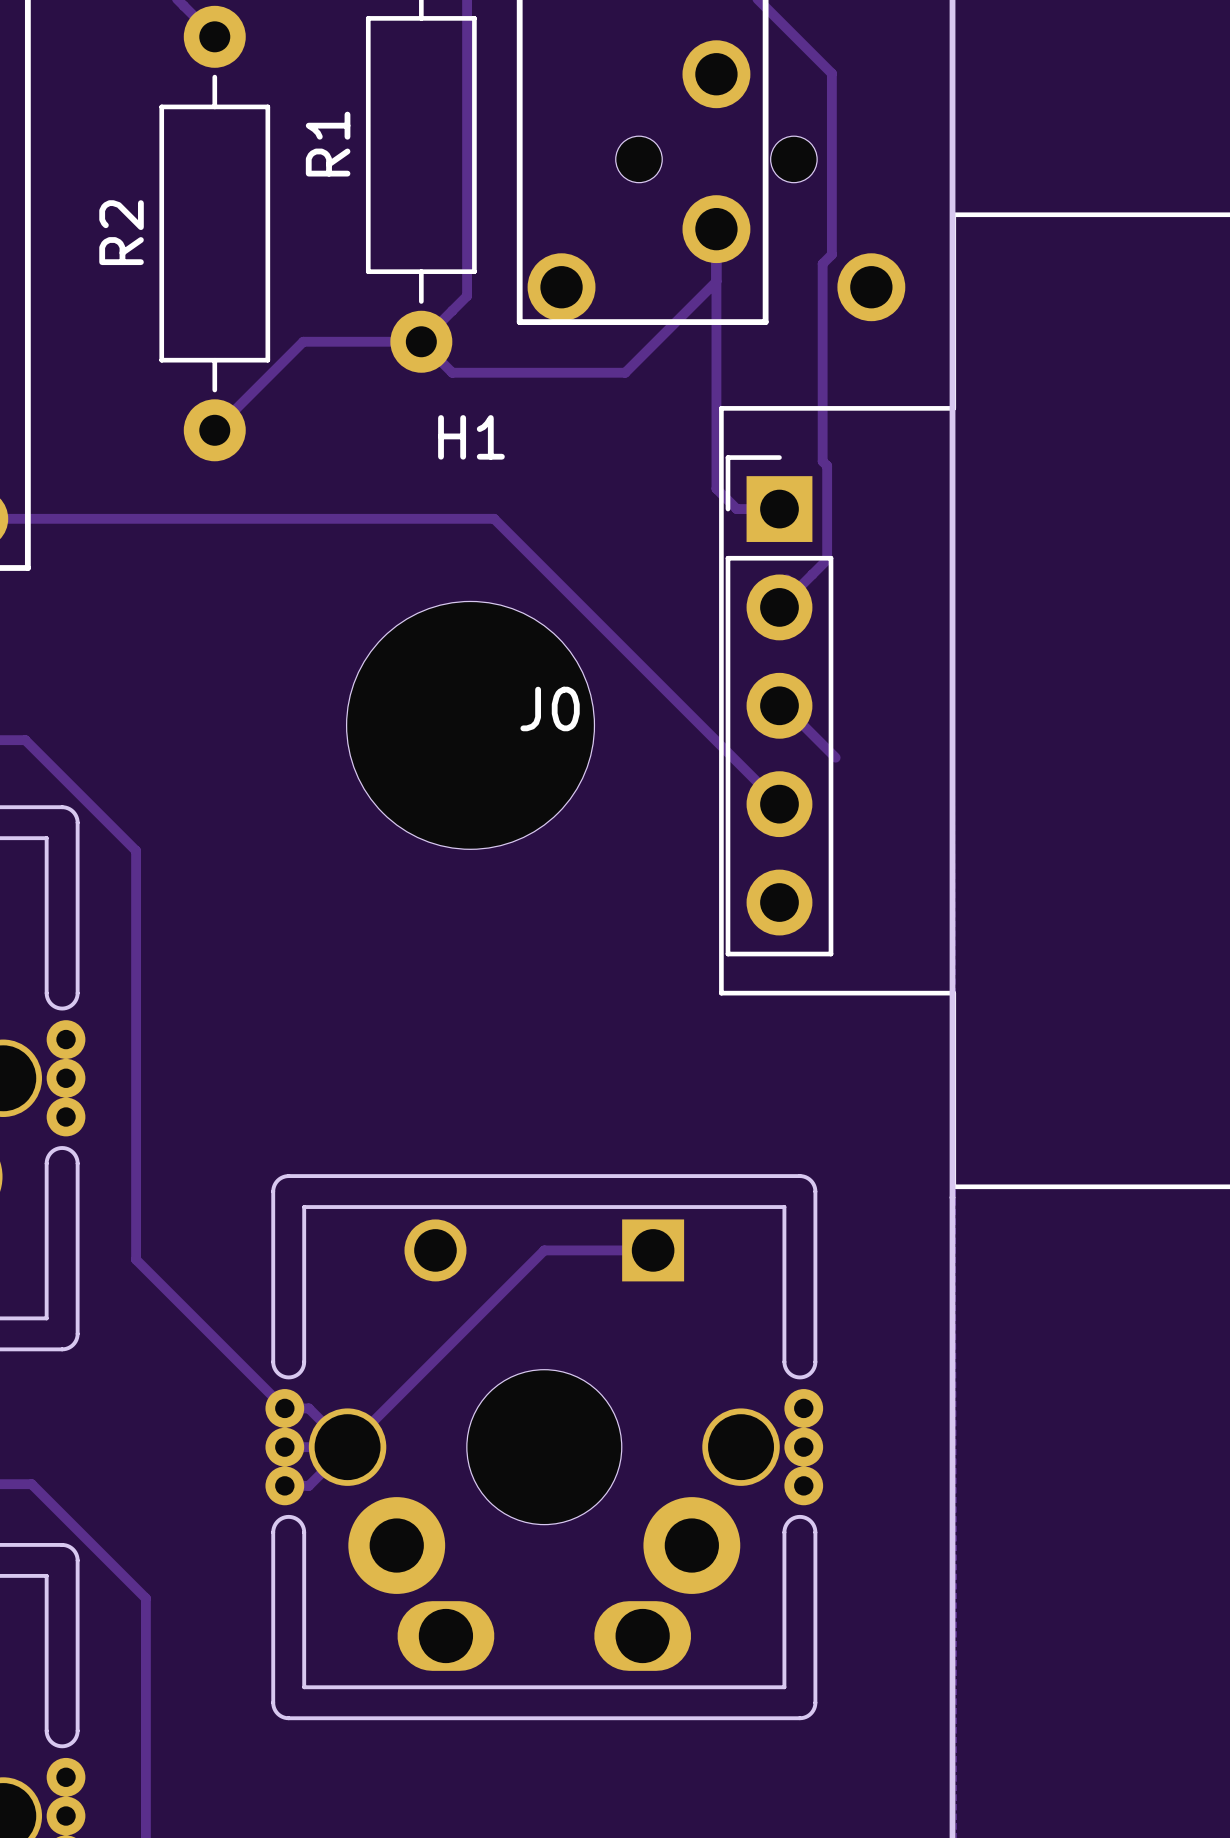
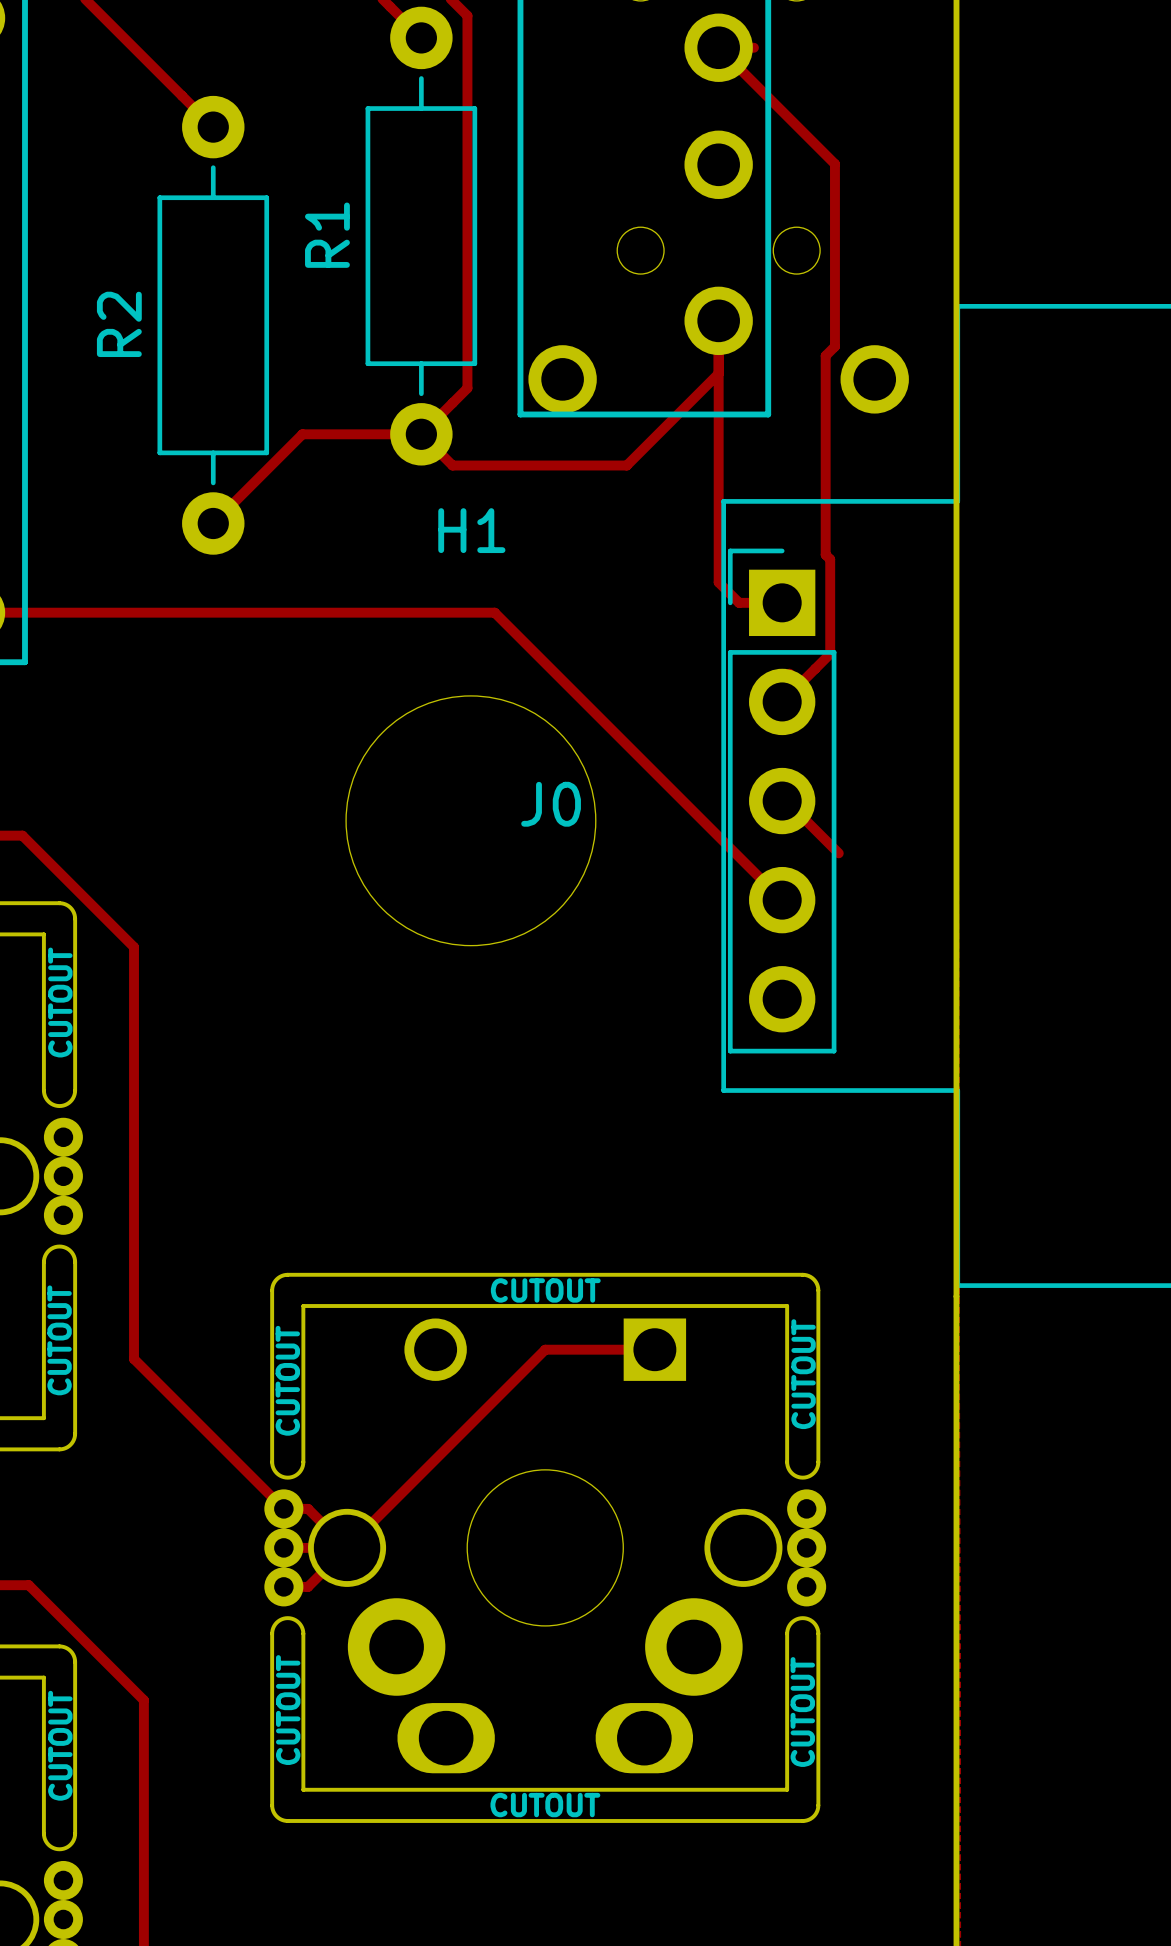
part text: none -> CUTOUT (60, 1002)
part text: none -> CUTOUT (545, 1290)
part text: none -> CUTOUT (59, 1340)
part text: none -> CUTOUT (803, 1374)
part text: none -> CUTOUT (287, 1380)
part text: none -> CUTOUT (288, 1710)
part text: none -> CUTOUT (802, 1711)
part text: none -> CUTOUT (60, 1745)
part text: none -> CUTOUT (545, 1805)

